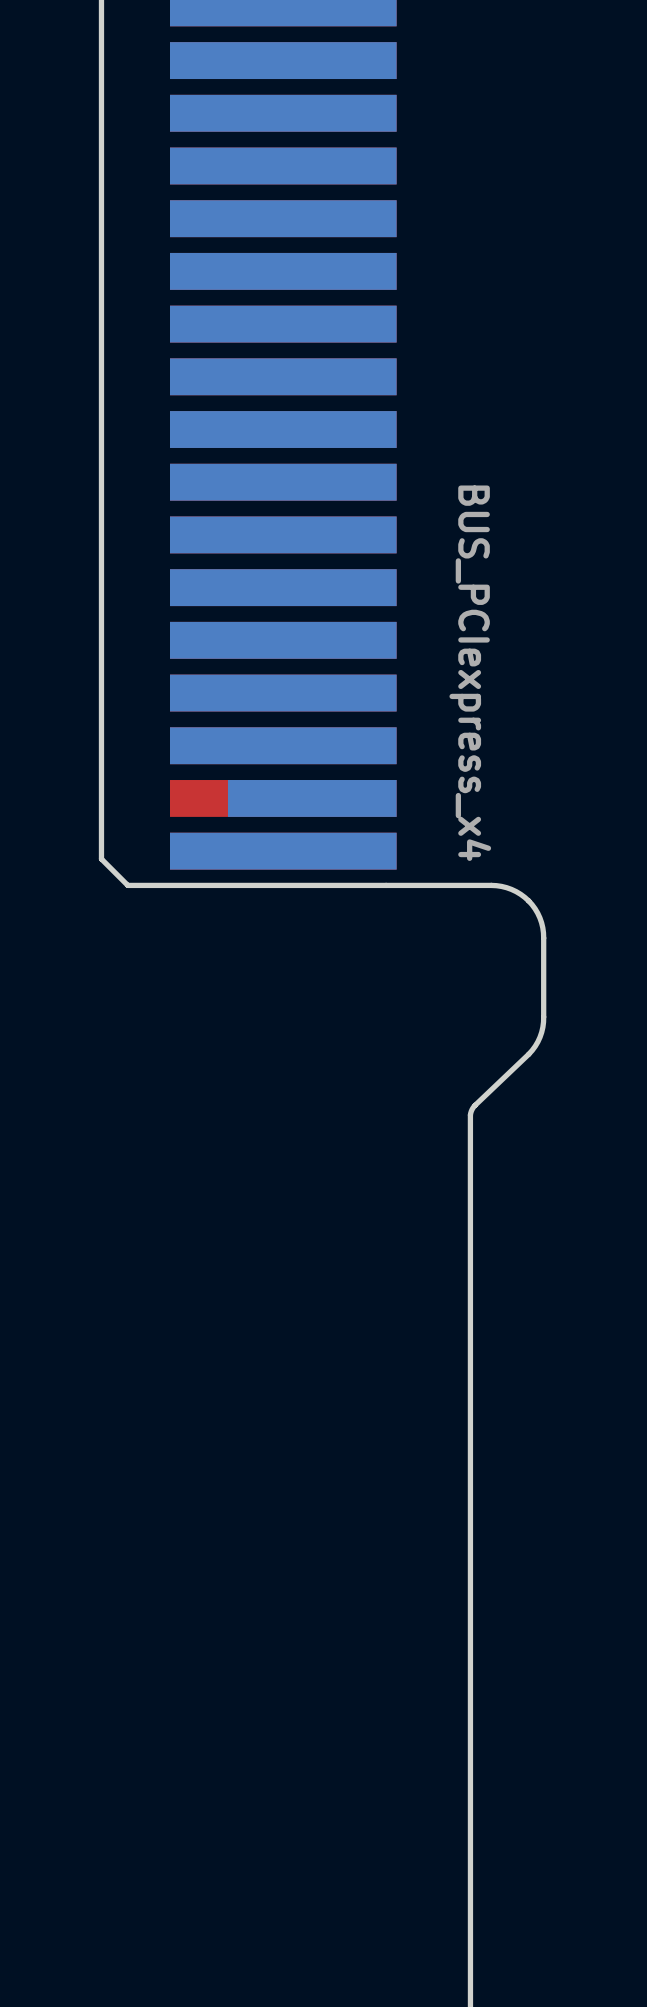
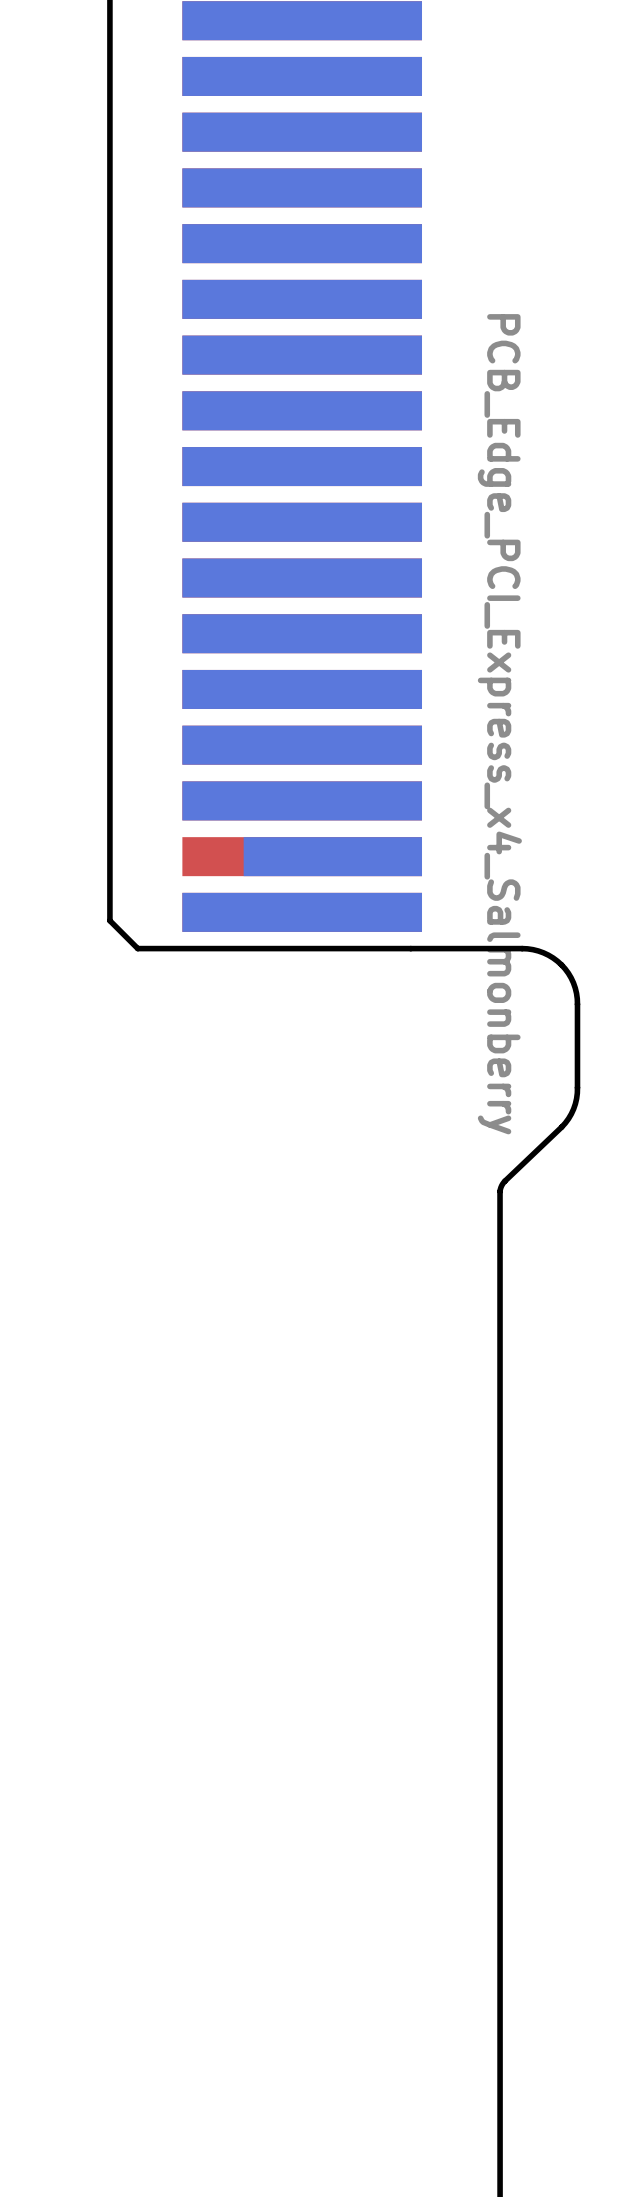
part value: BUS_PCIexpress_x4 (470, 673) -> PCB_Edge_PCI_Express_x4_Salmonberry (499, 724)

